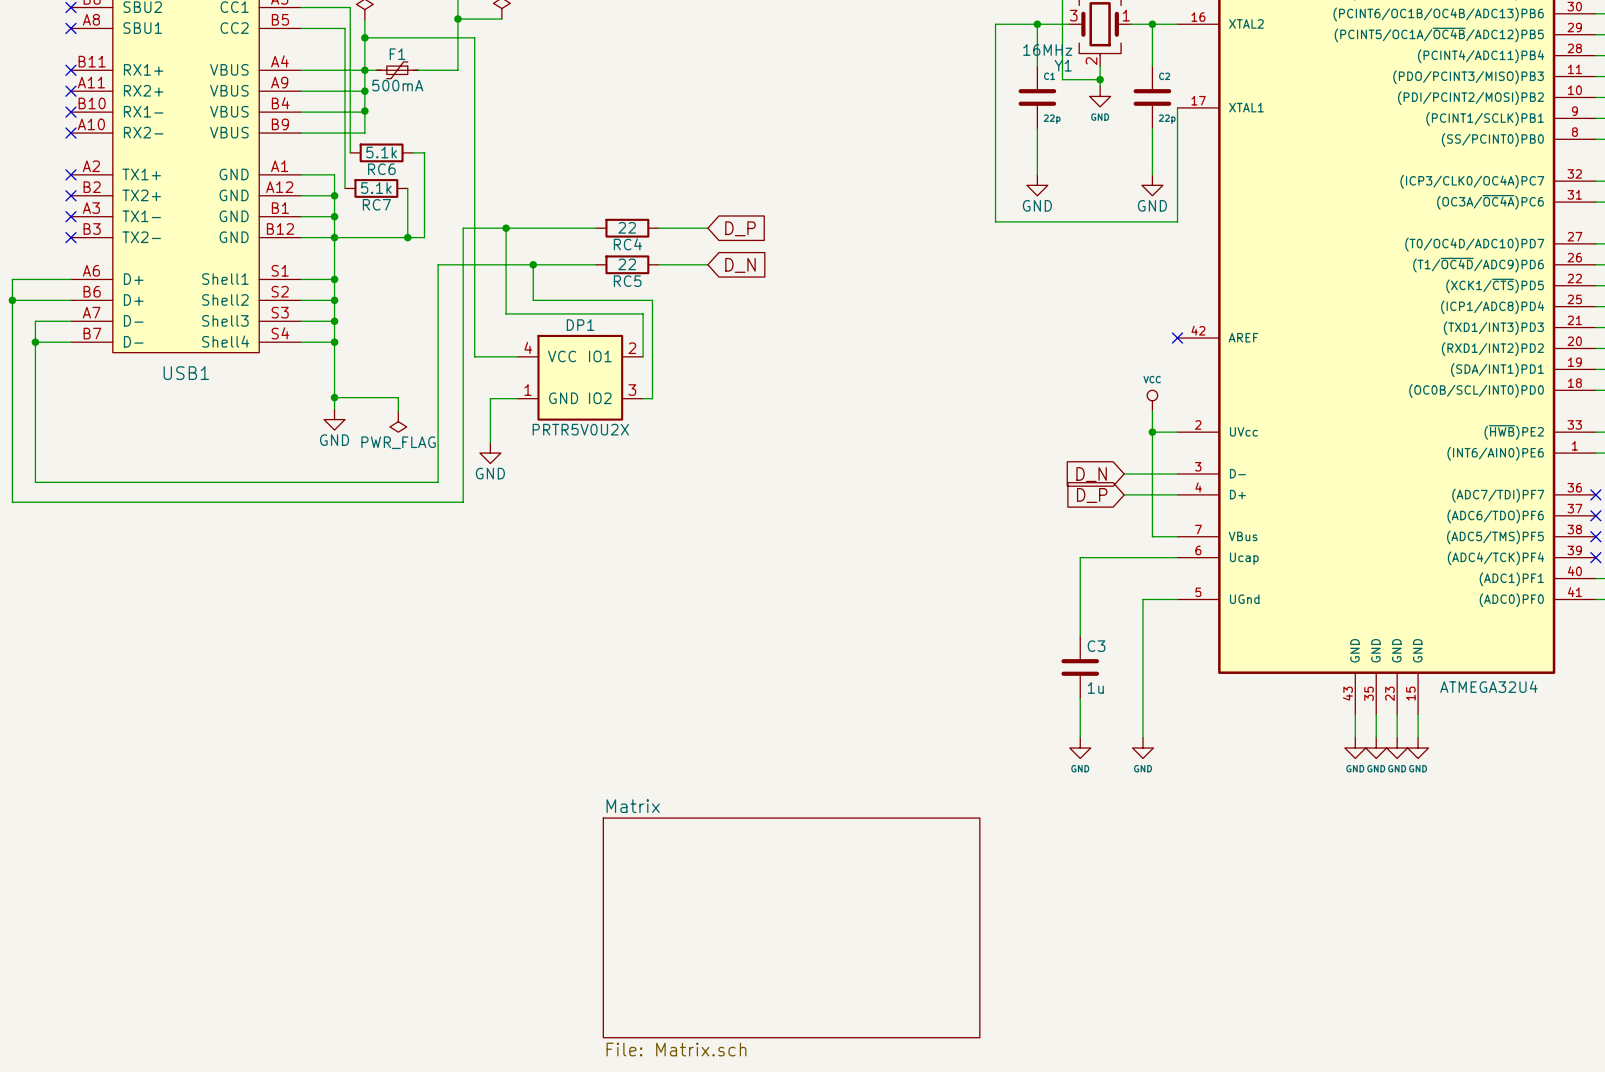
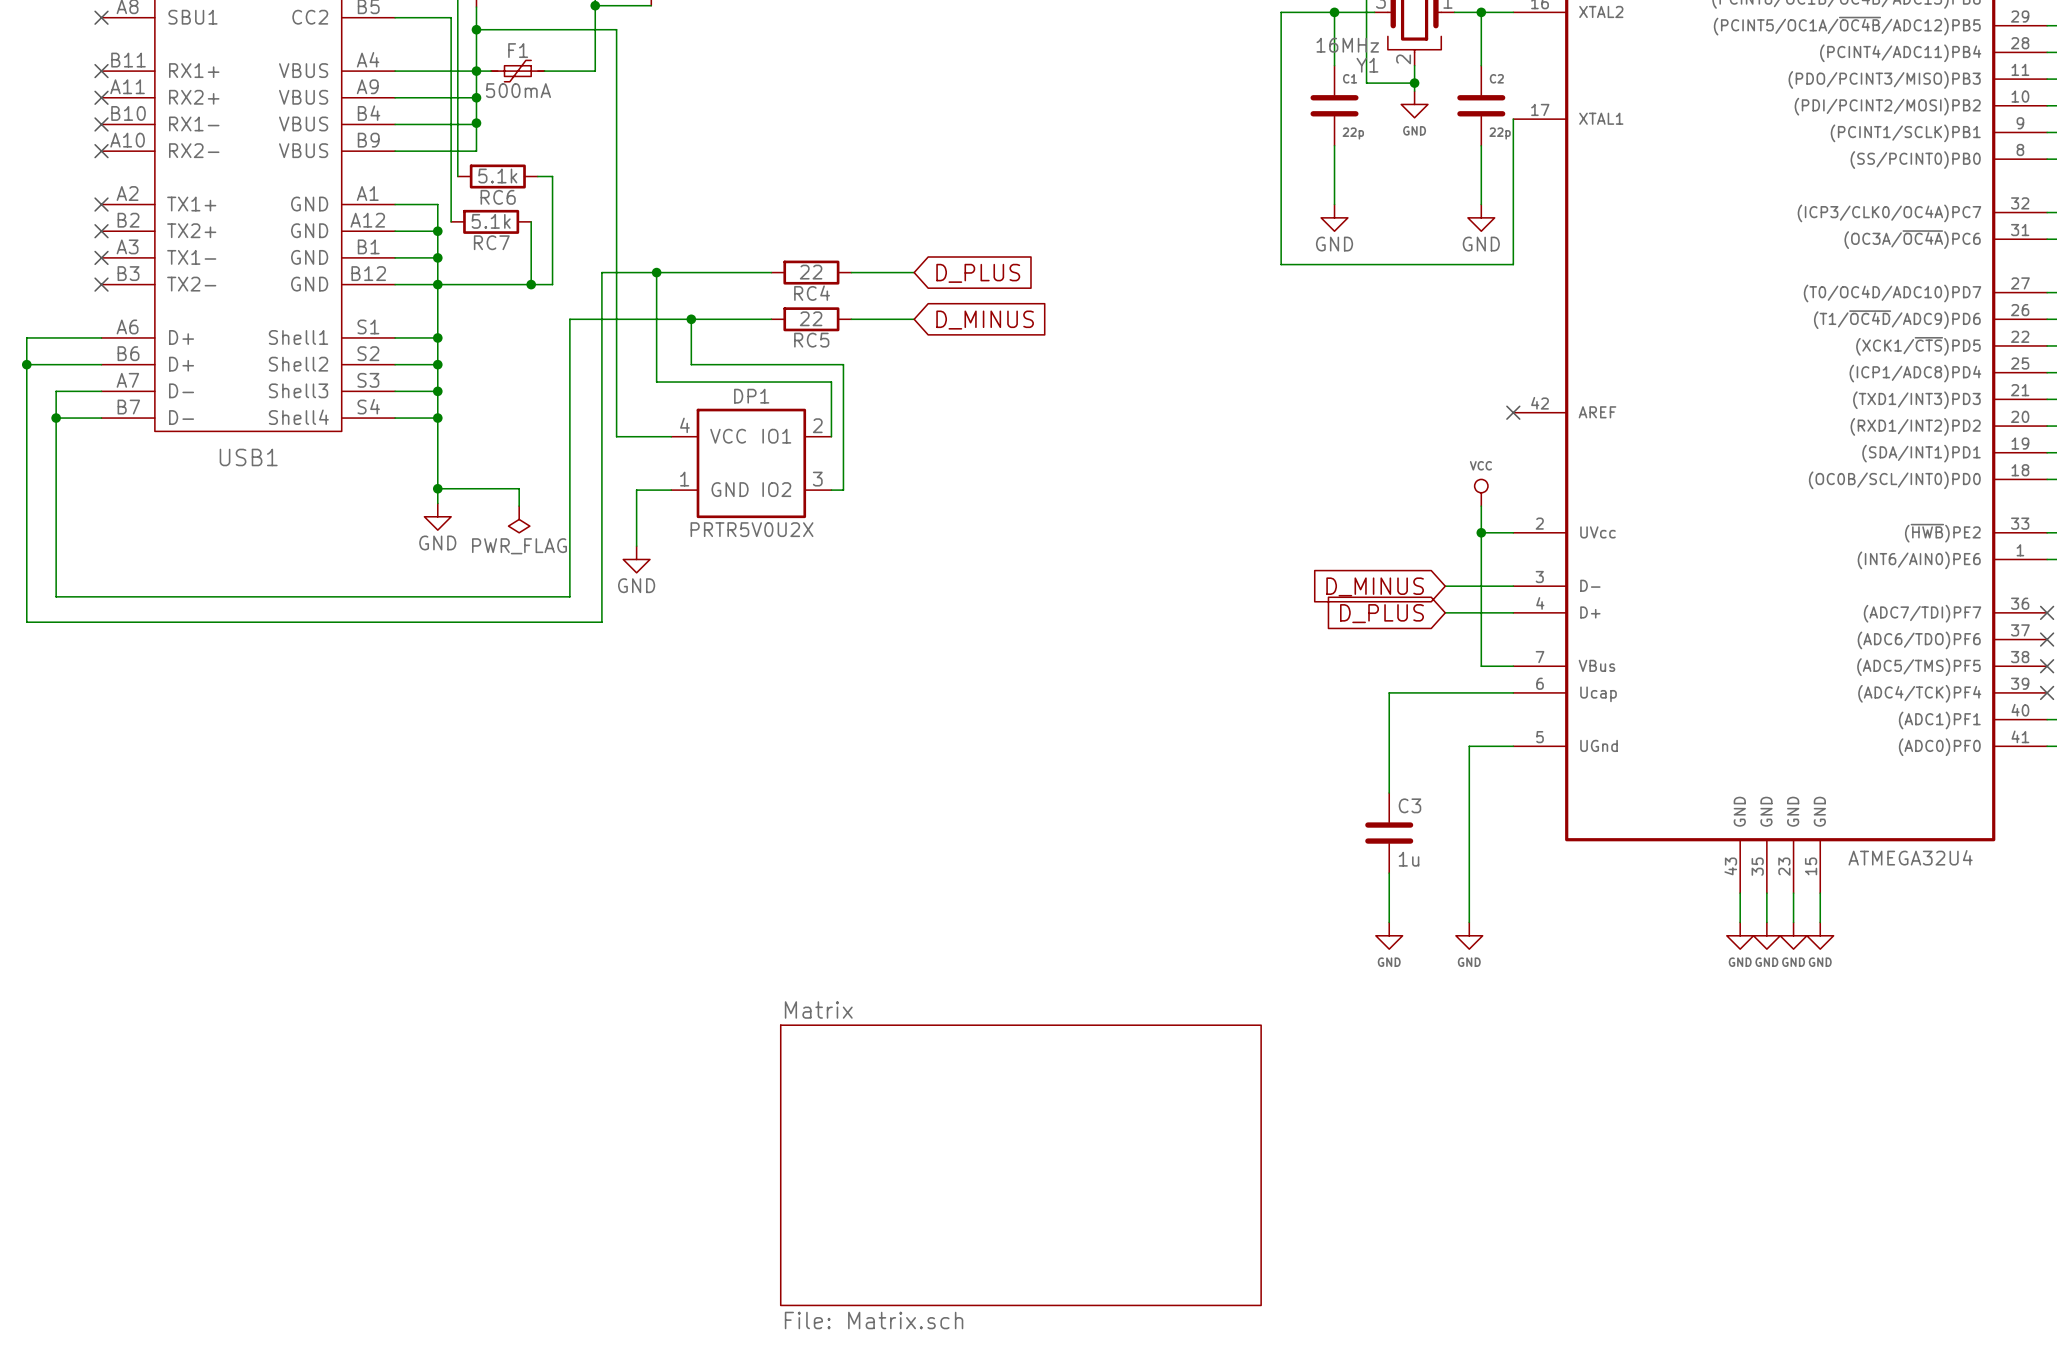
global label: D_P (740, 228) -> D_PLUS (978, 273)
global label: D_N (740, 265) -> D_MINUS (985, 320)
global label: D_N (1091, 474) -> D_MINUS (1375, 586)
global label: D_P (1092, 495) -> D_PLUS (1381, 613)

